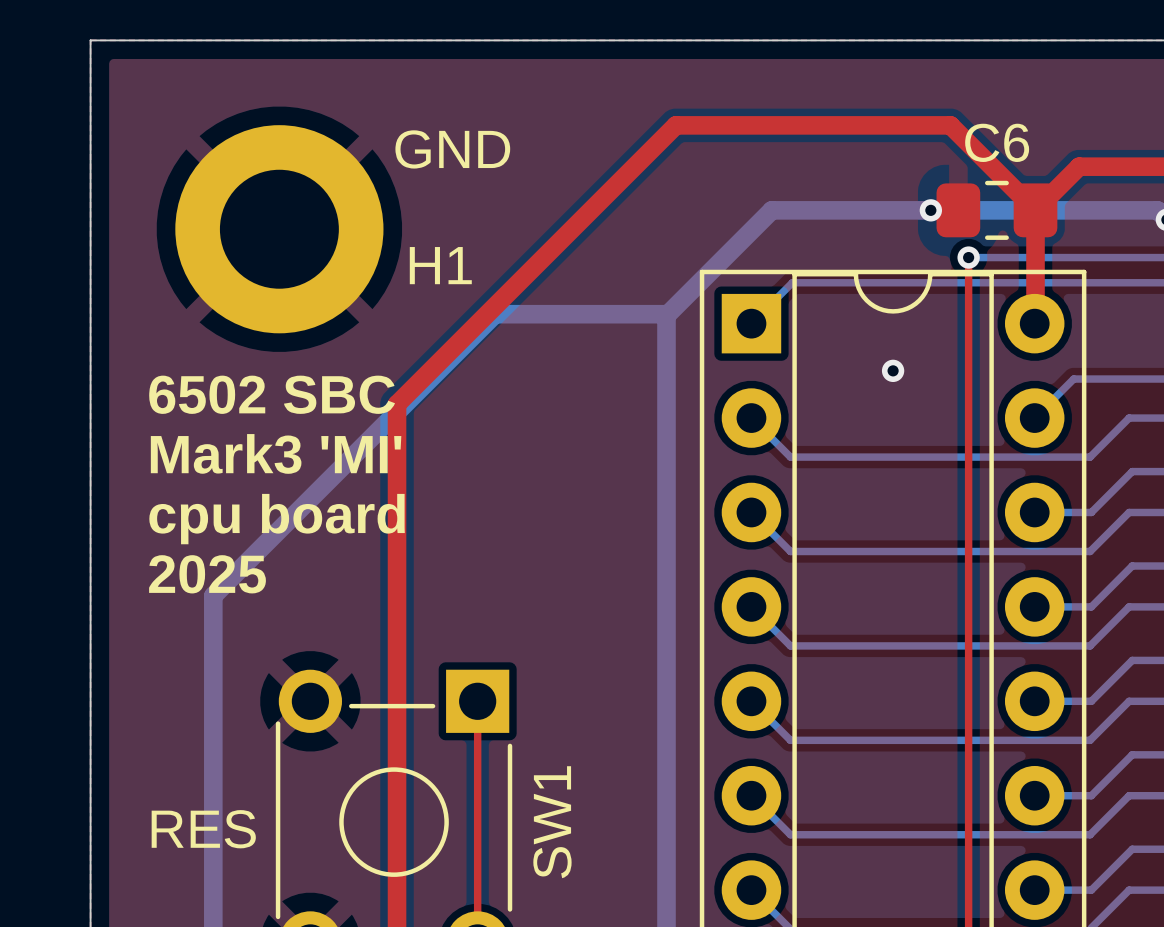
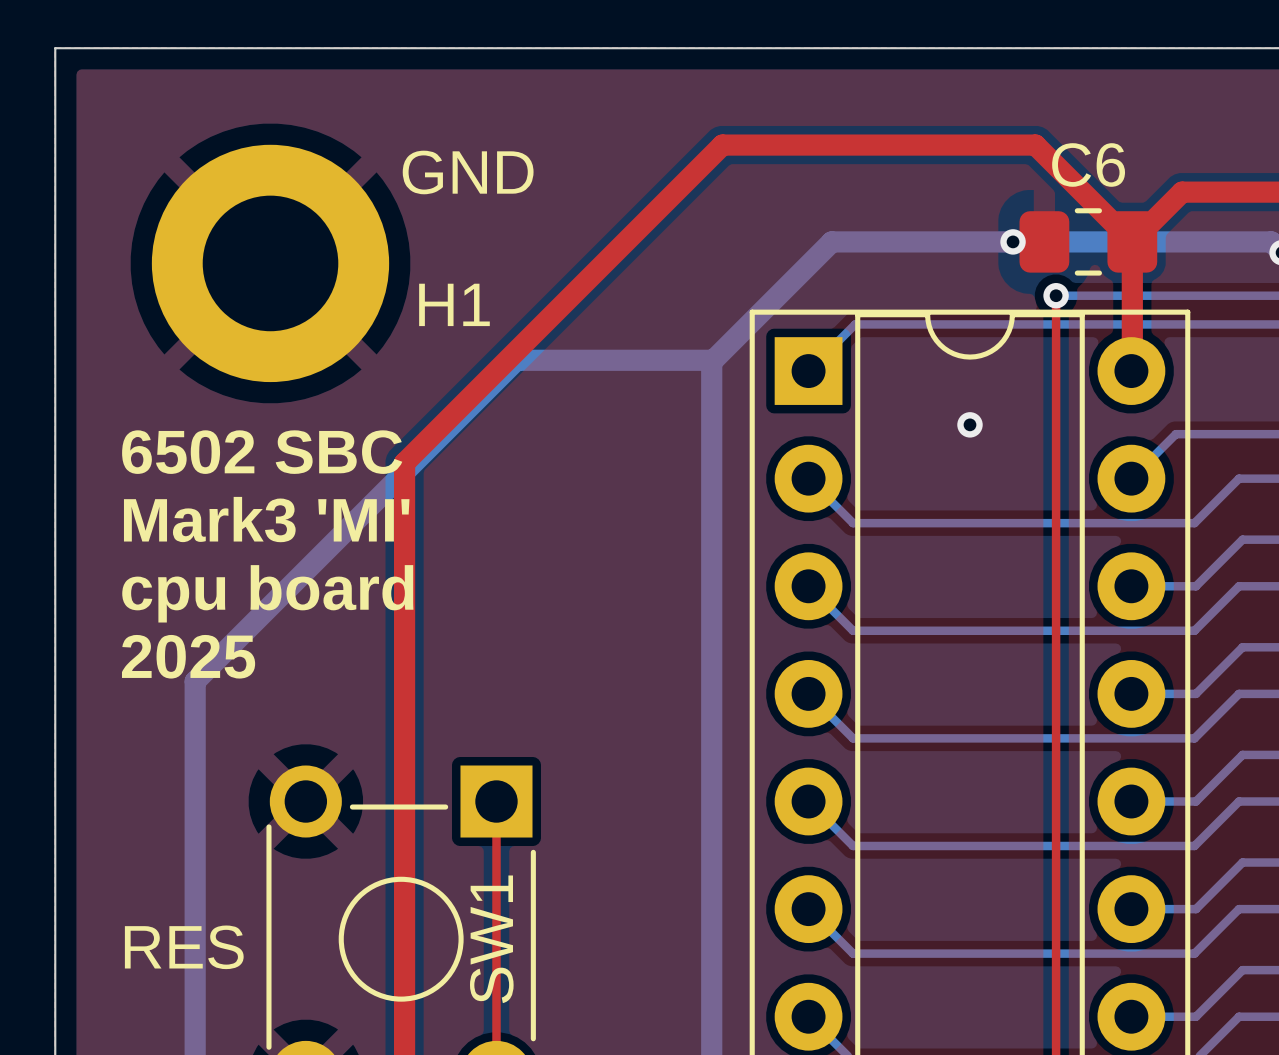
SW1 name position: SW1 (552, 822) -> SW1 (491, 939)

